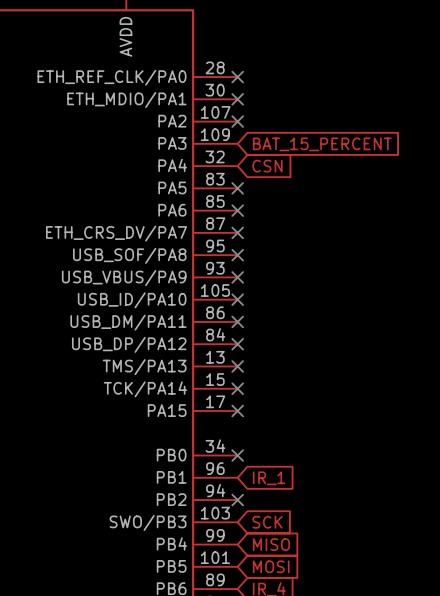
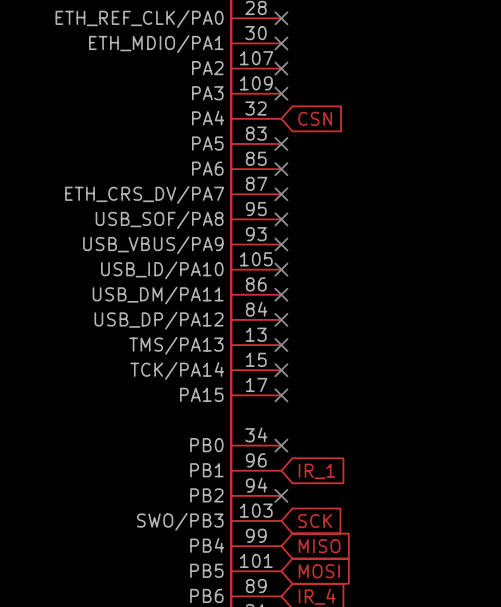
no-connect mark: none -> (281, 93)
global label: BAT_15_PERCENT (322, 144) -> none

